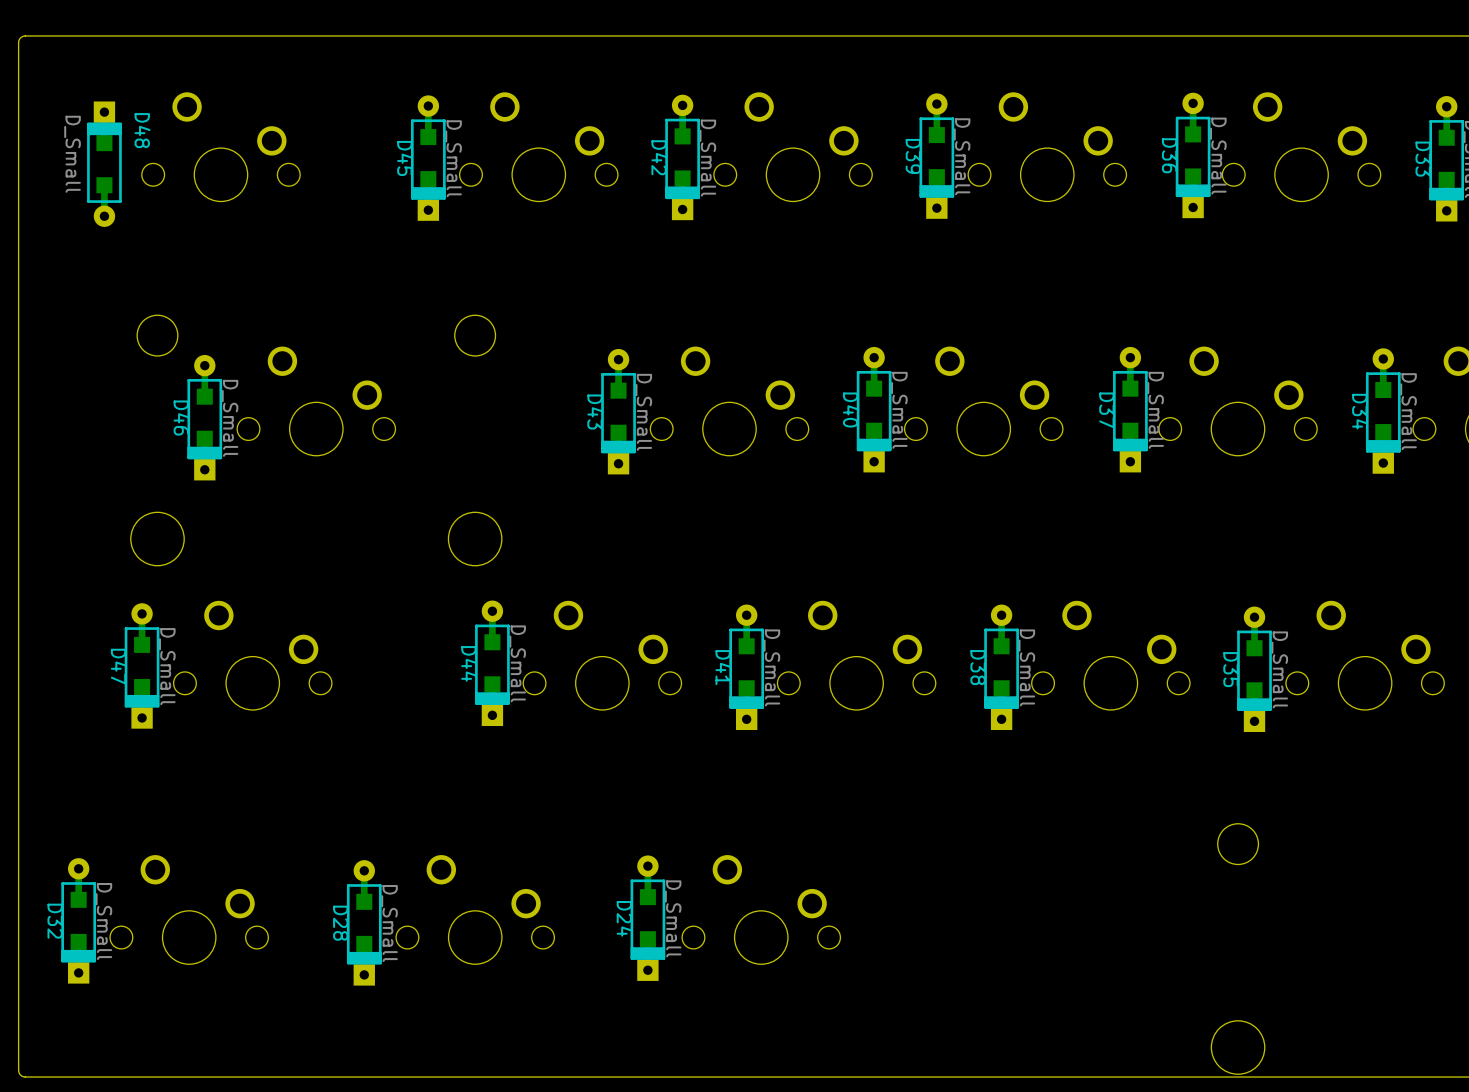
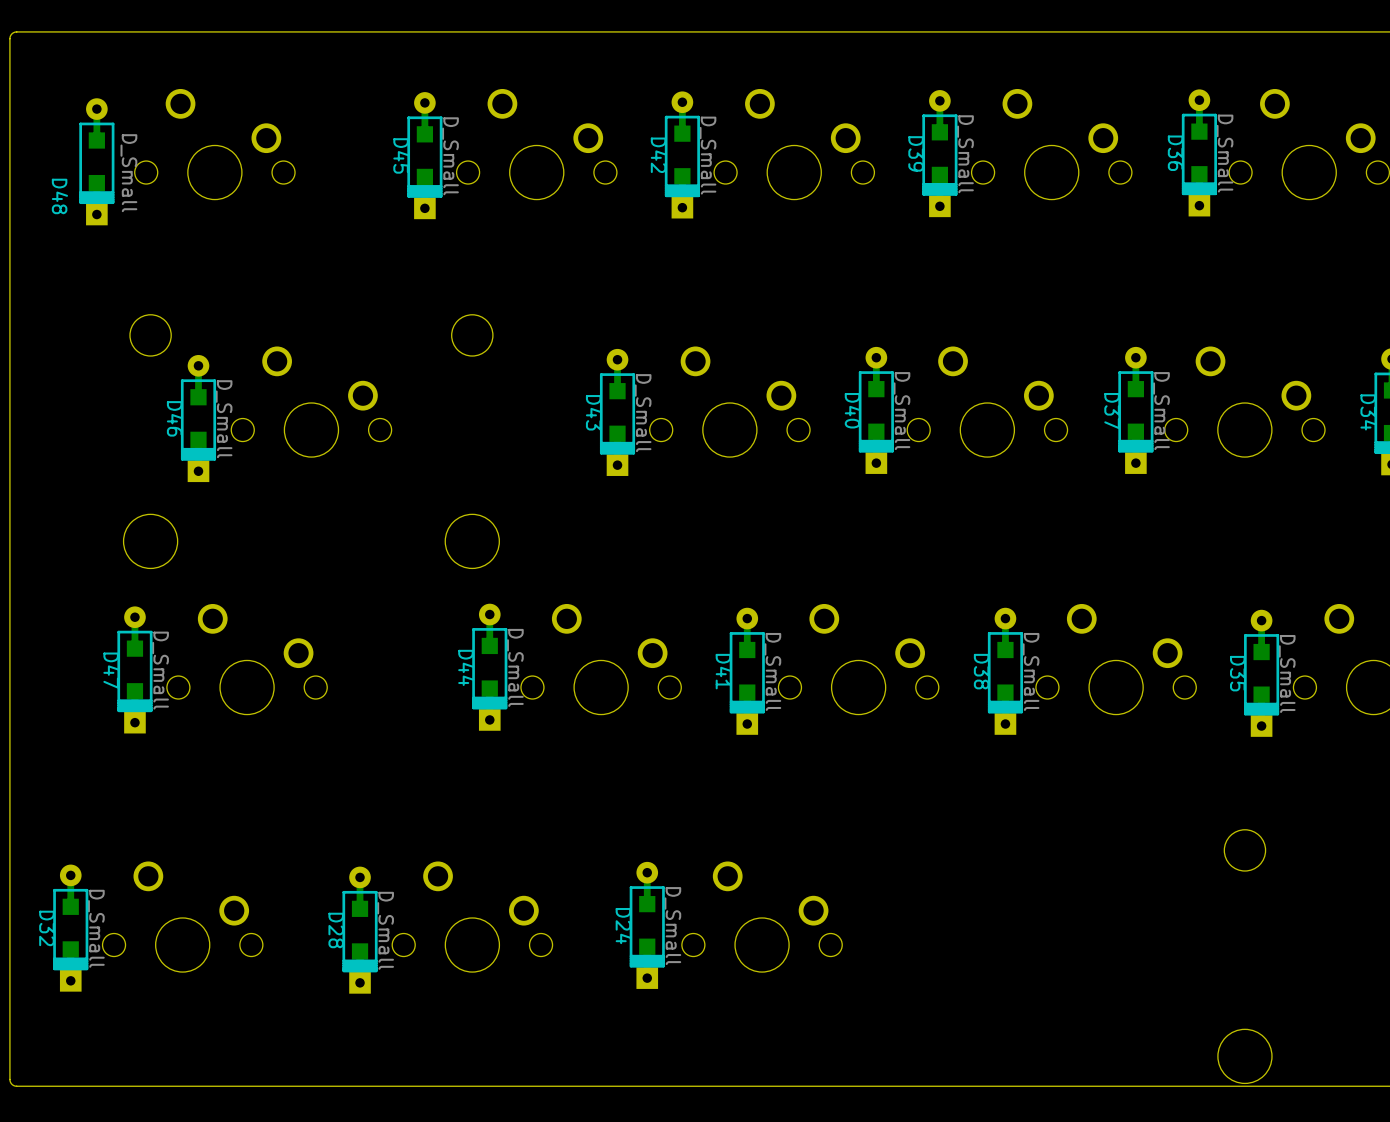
D48 rotation: 0° (104, 164) -> 180° (96, 161)

